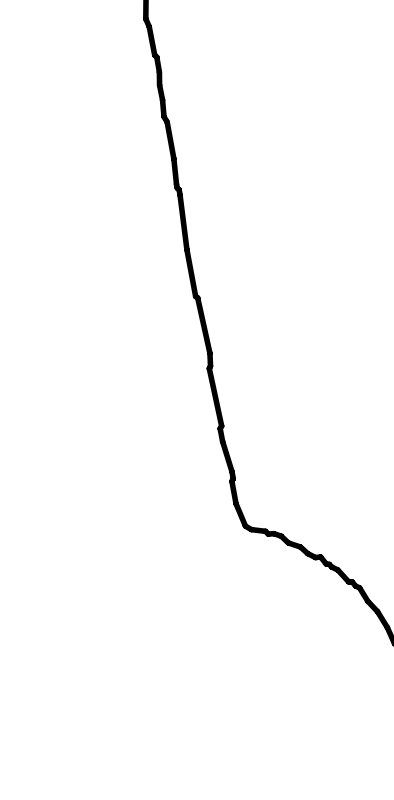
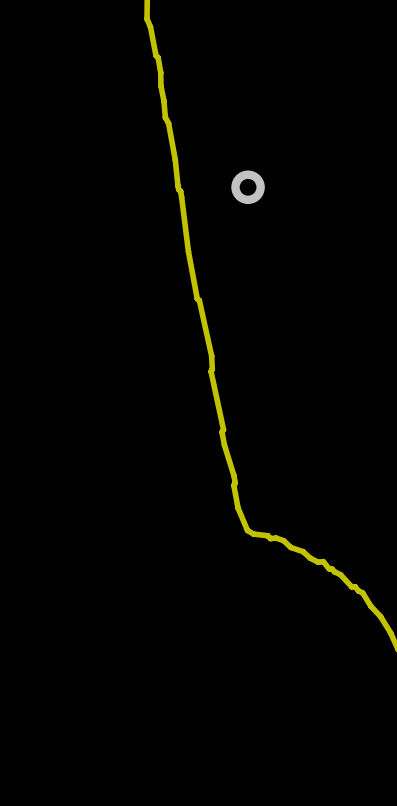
via: none -> (248, 187)

